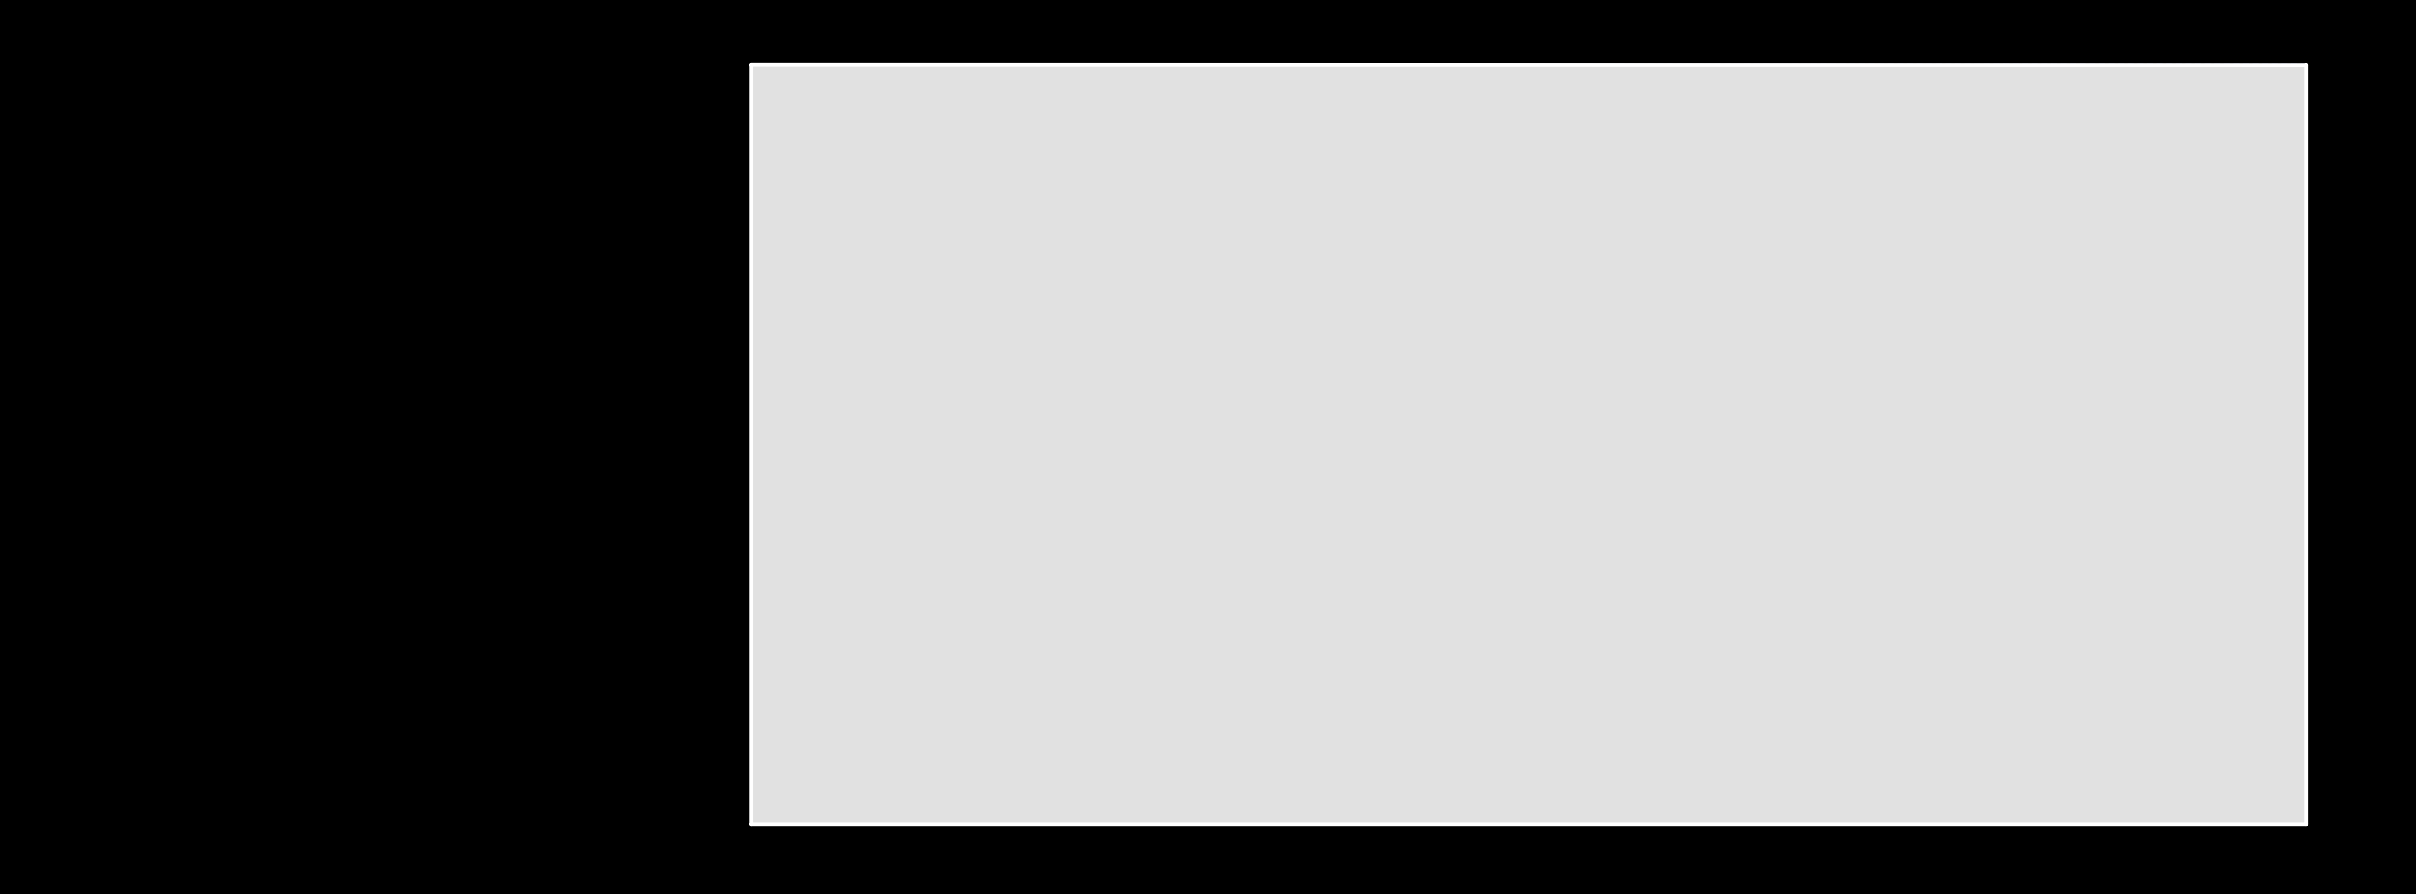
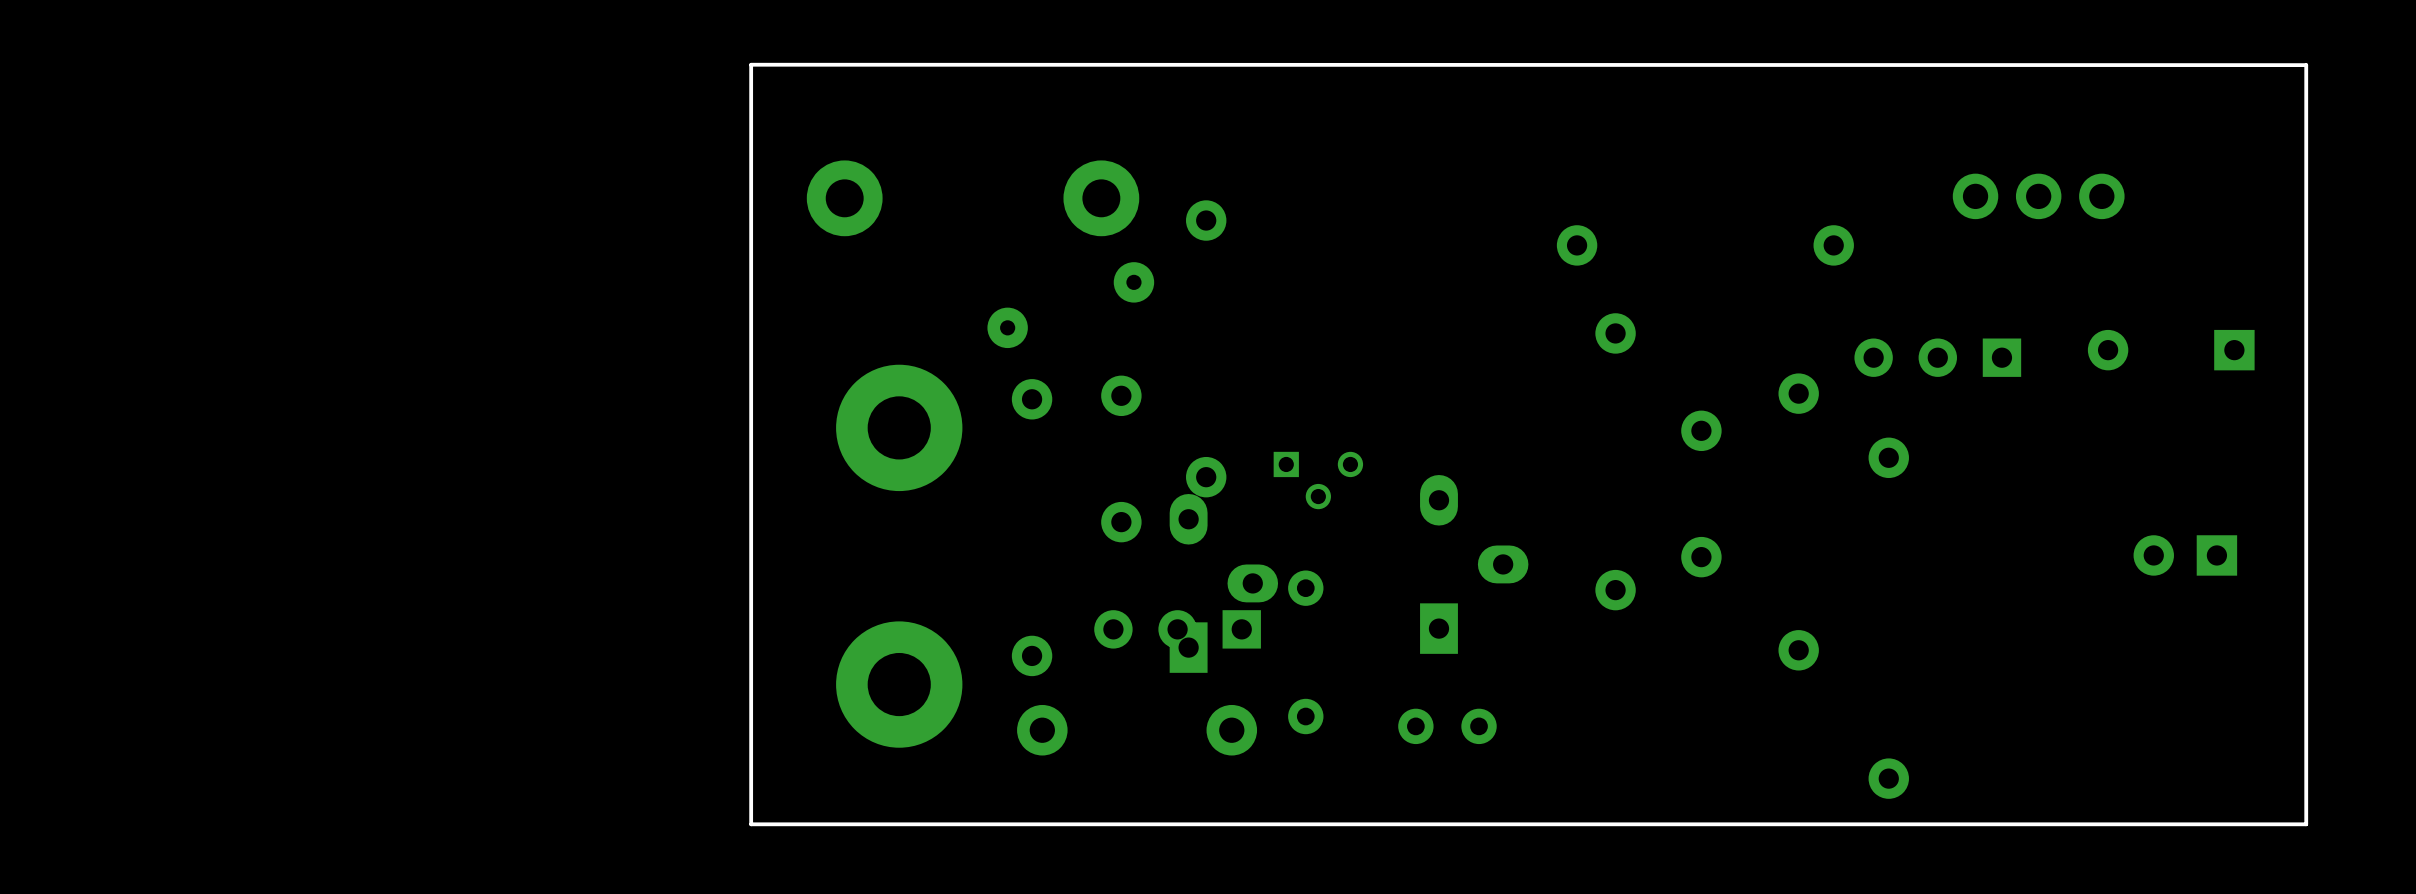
drawing: [751, 64, 2307, 825] -> none
part: none -> (1223, 583)

